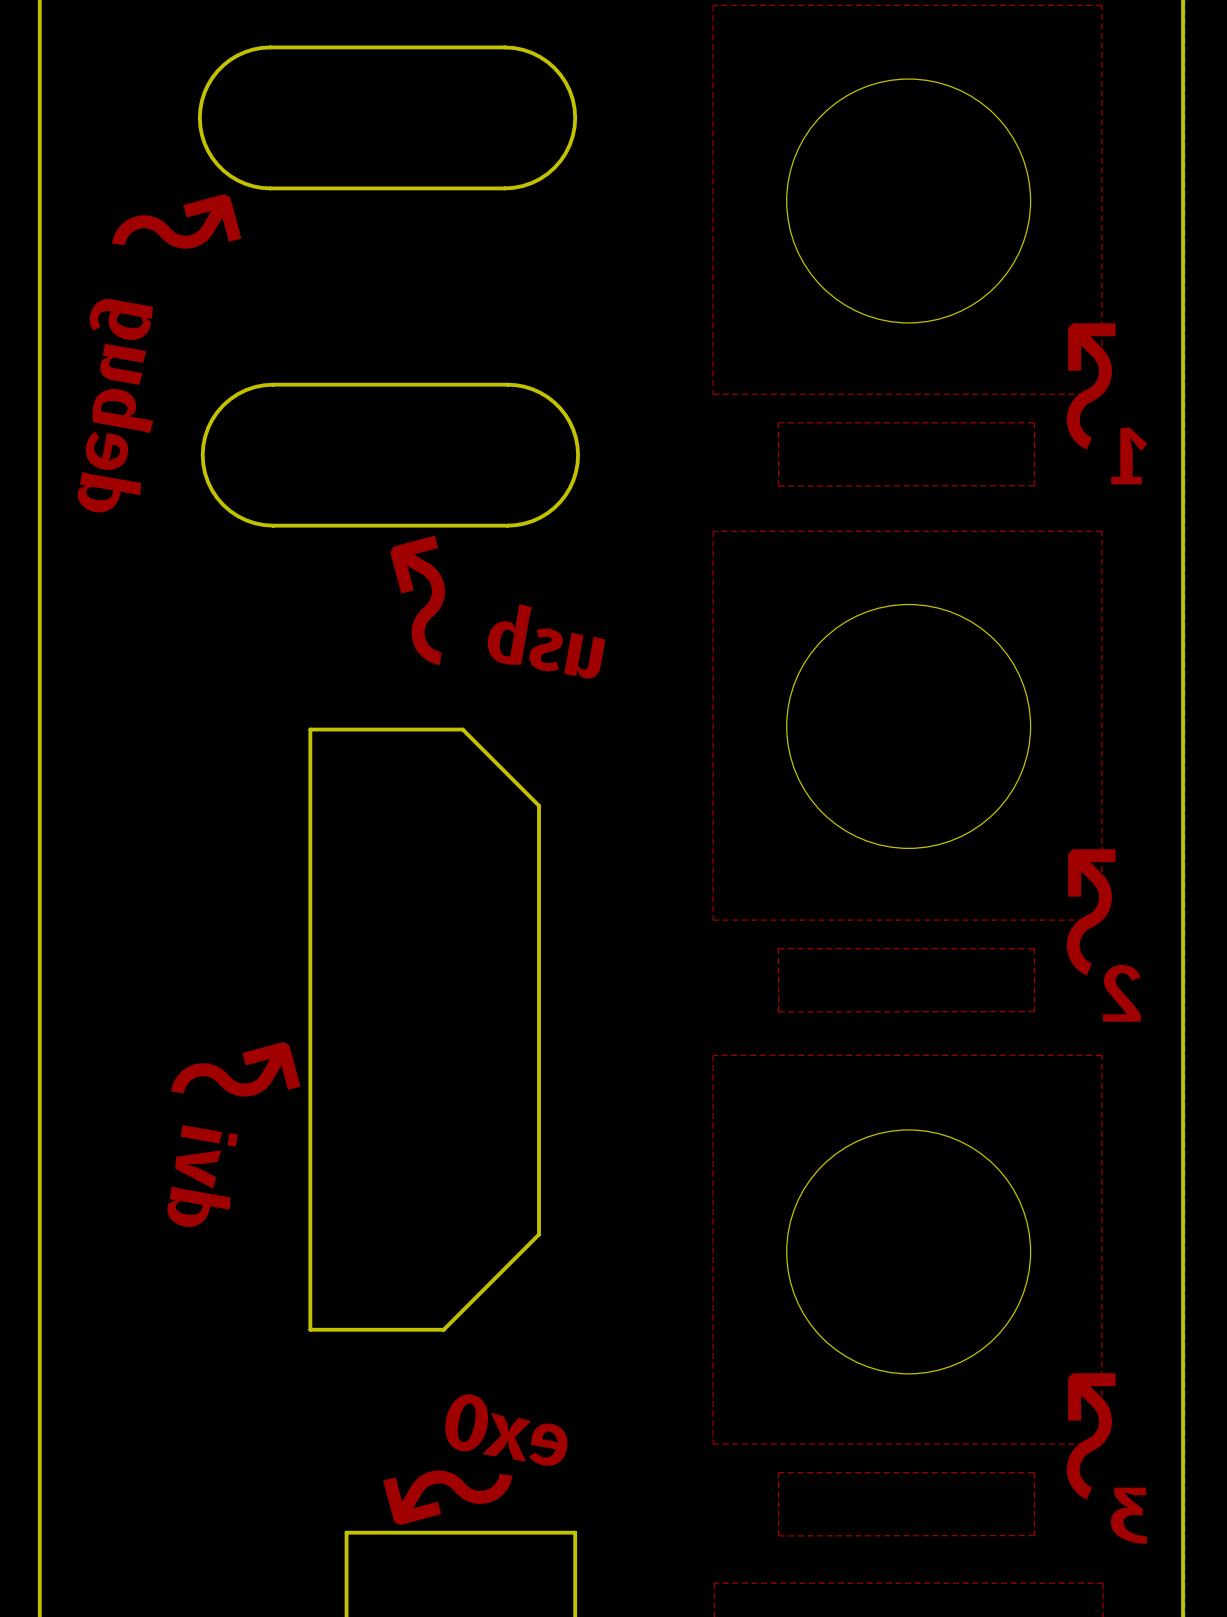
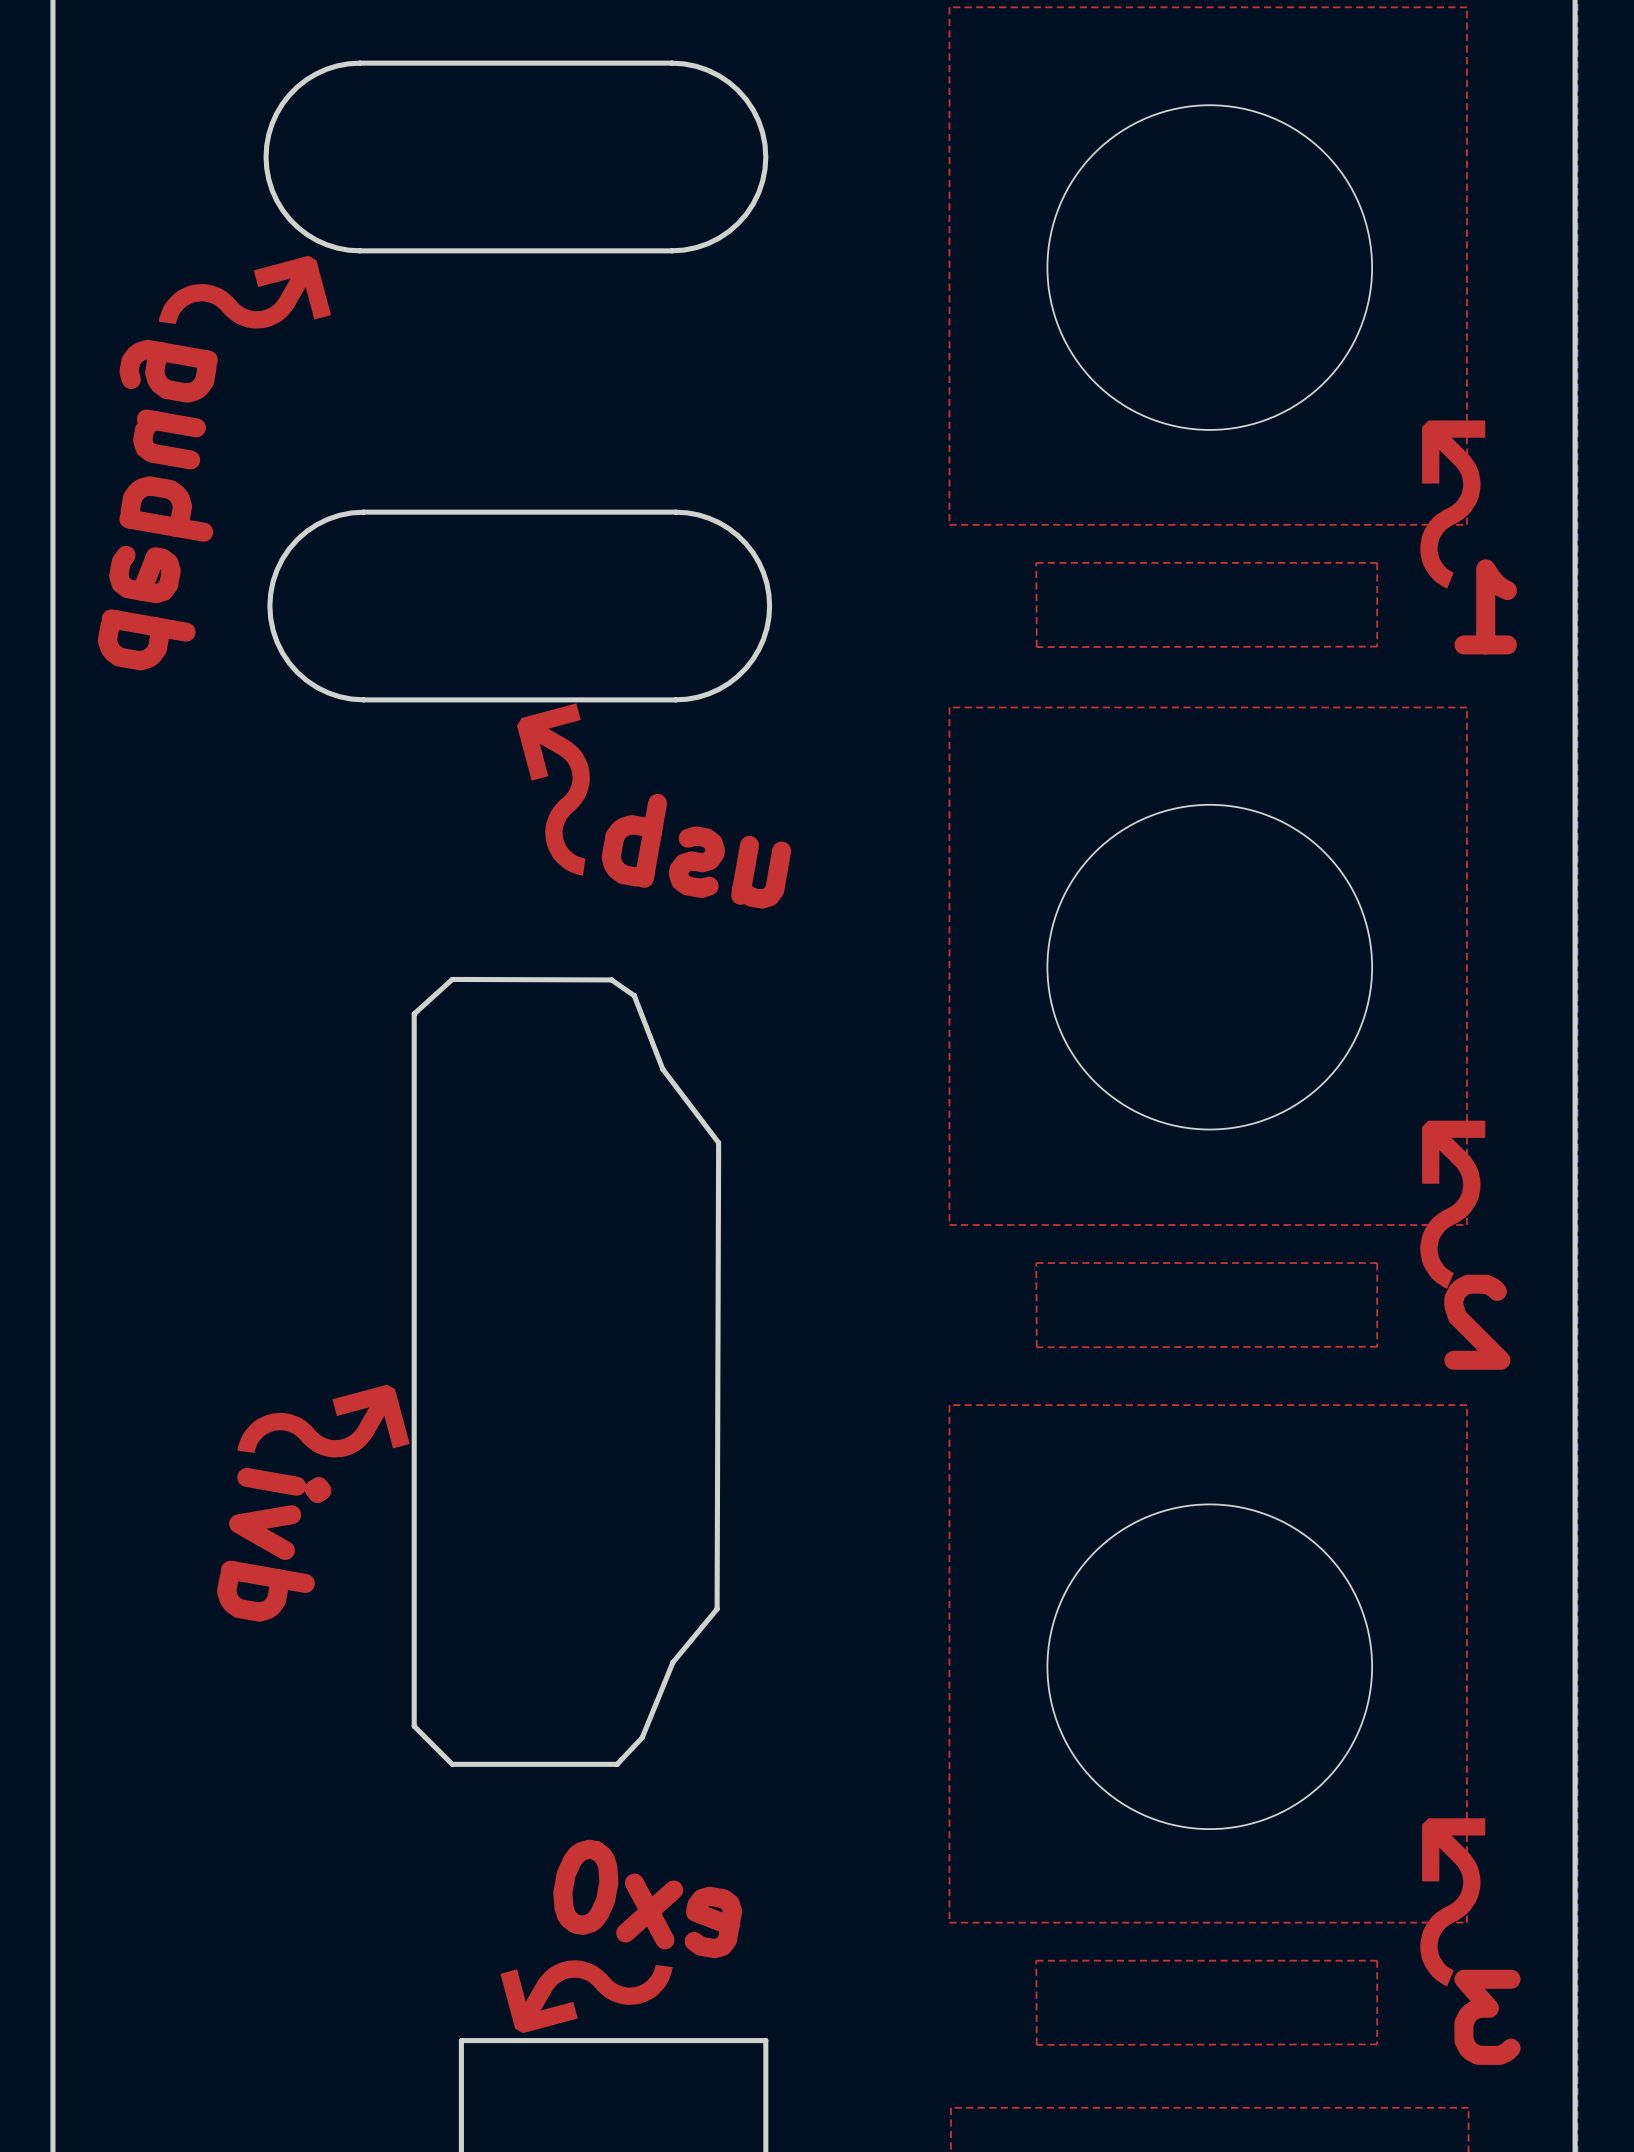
board edge: (462, 729) (310, 729) (310, 1329) (443, 1329) (539, 1234) (539, 805) (462, 729) -> (452, 979) (611, 979) (634, 995) (662, 1069) (718, 1142) (717, 1609) (672, 1662) (642, 1737) (617, 1764) (452, 1764) (414, 1726) (414, 1013) (452, 979)

